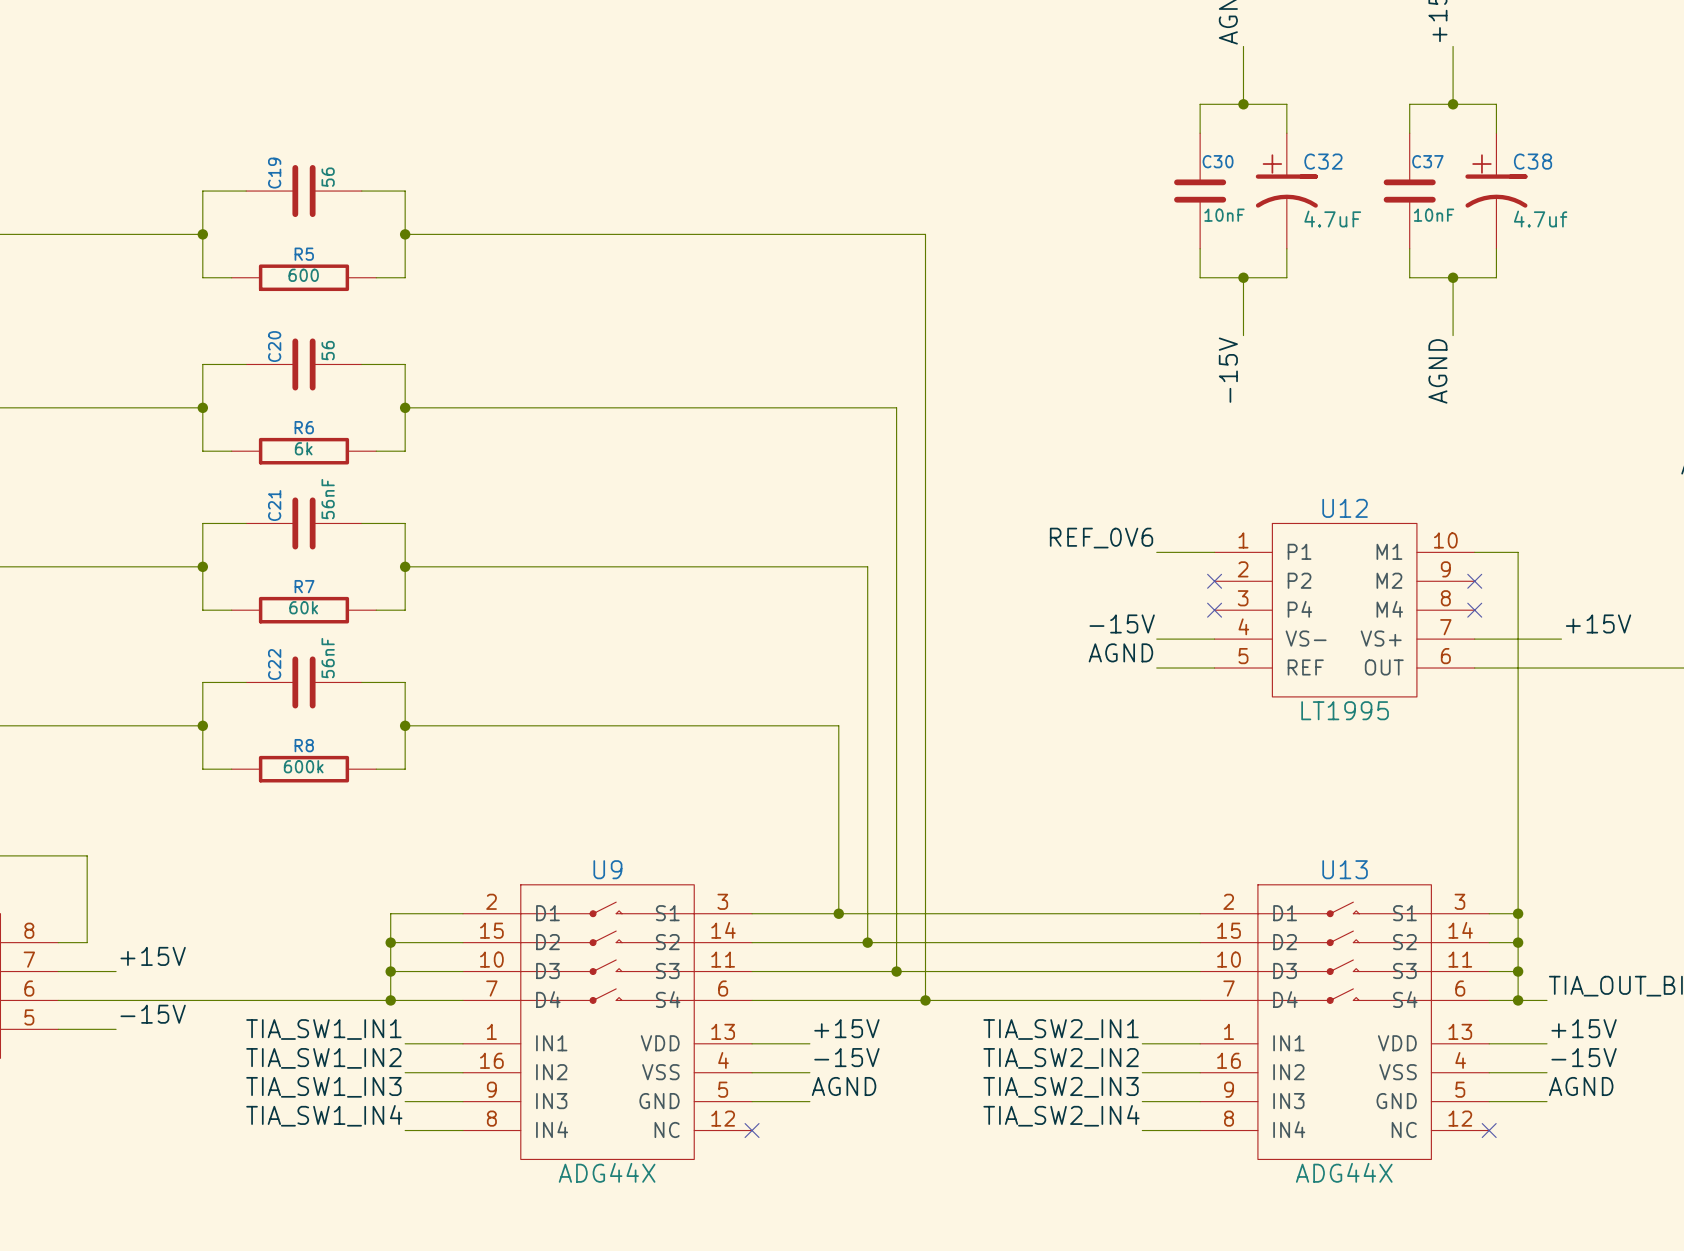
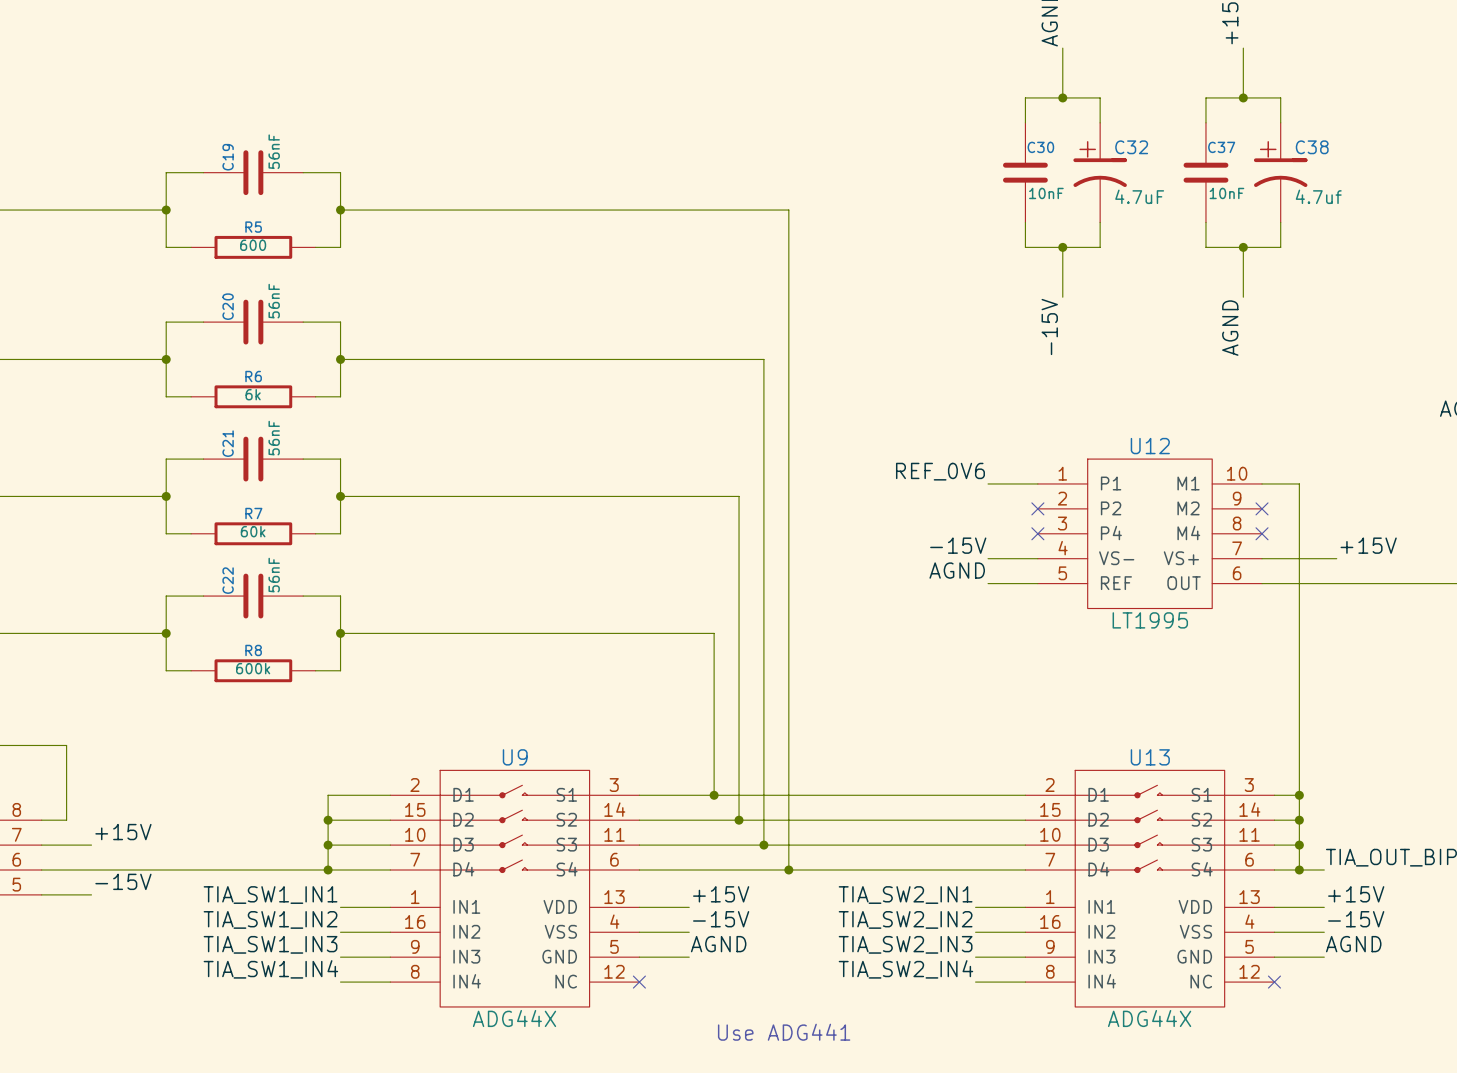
C19 value: 56 (328, 177) -> 56nF (274, 151)
C20 value: 56 (328, 350) -> 56nF (274, 301)
text: none -> Use ADG441 (784, 1032)

